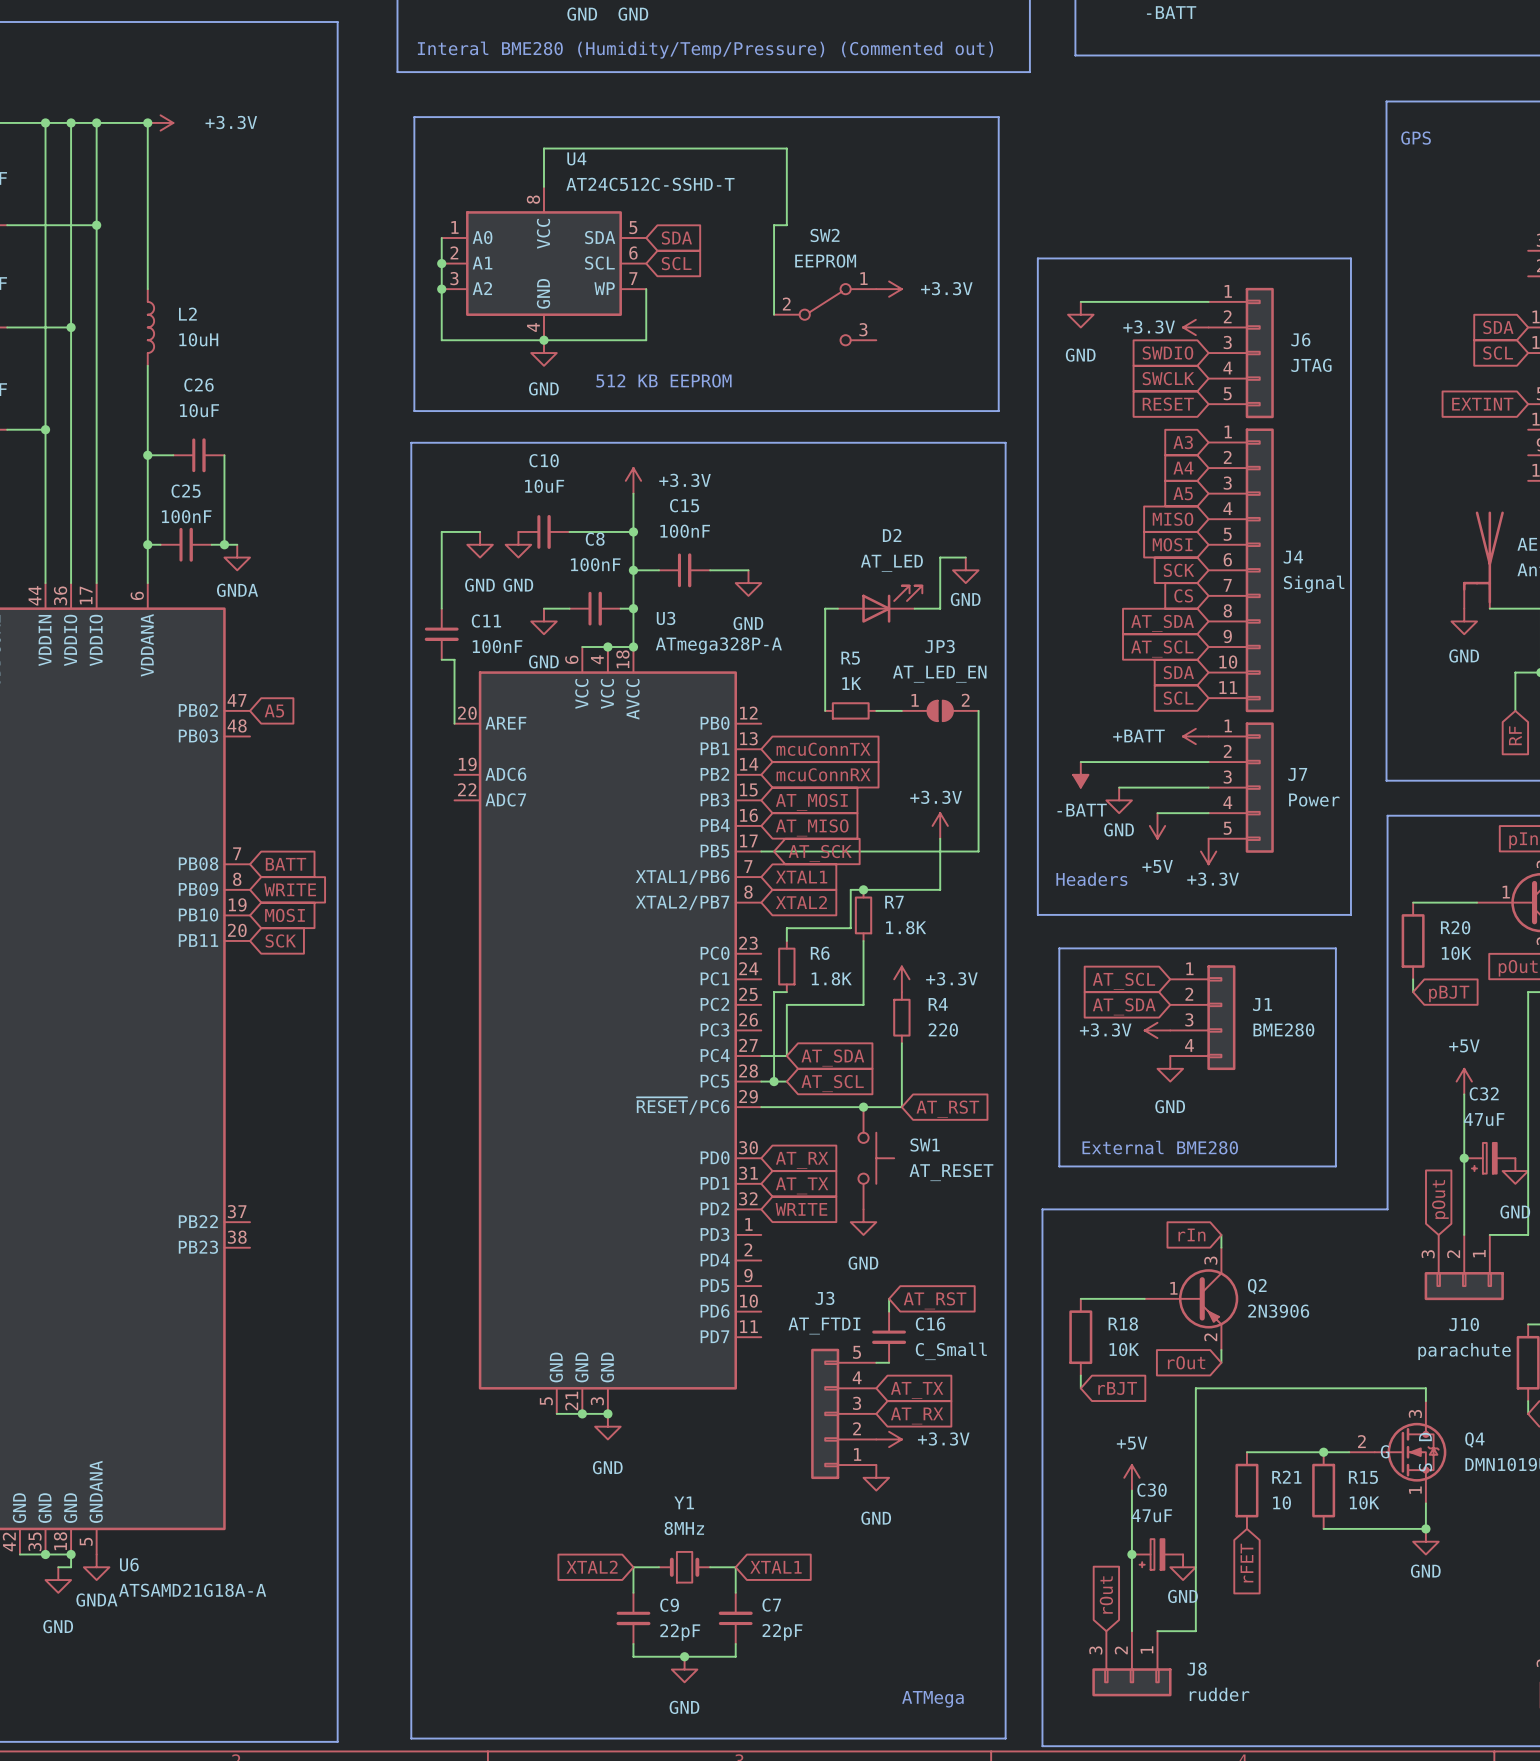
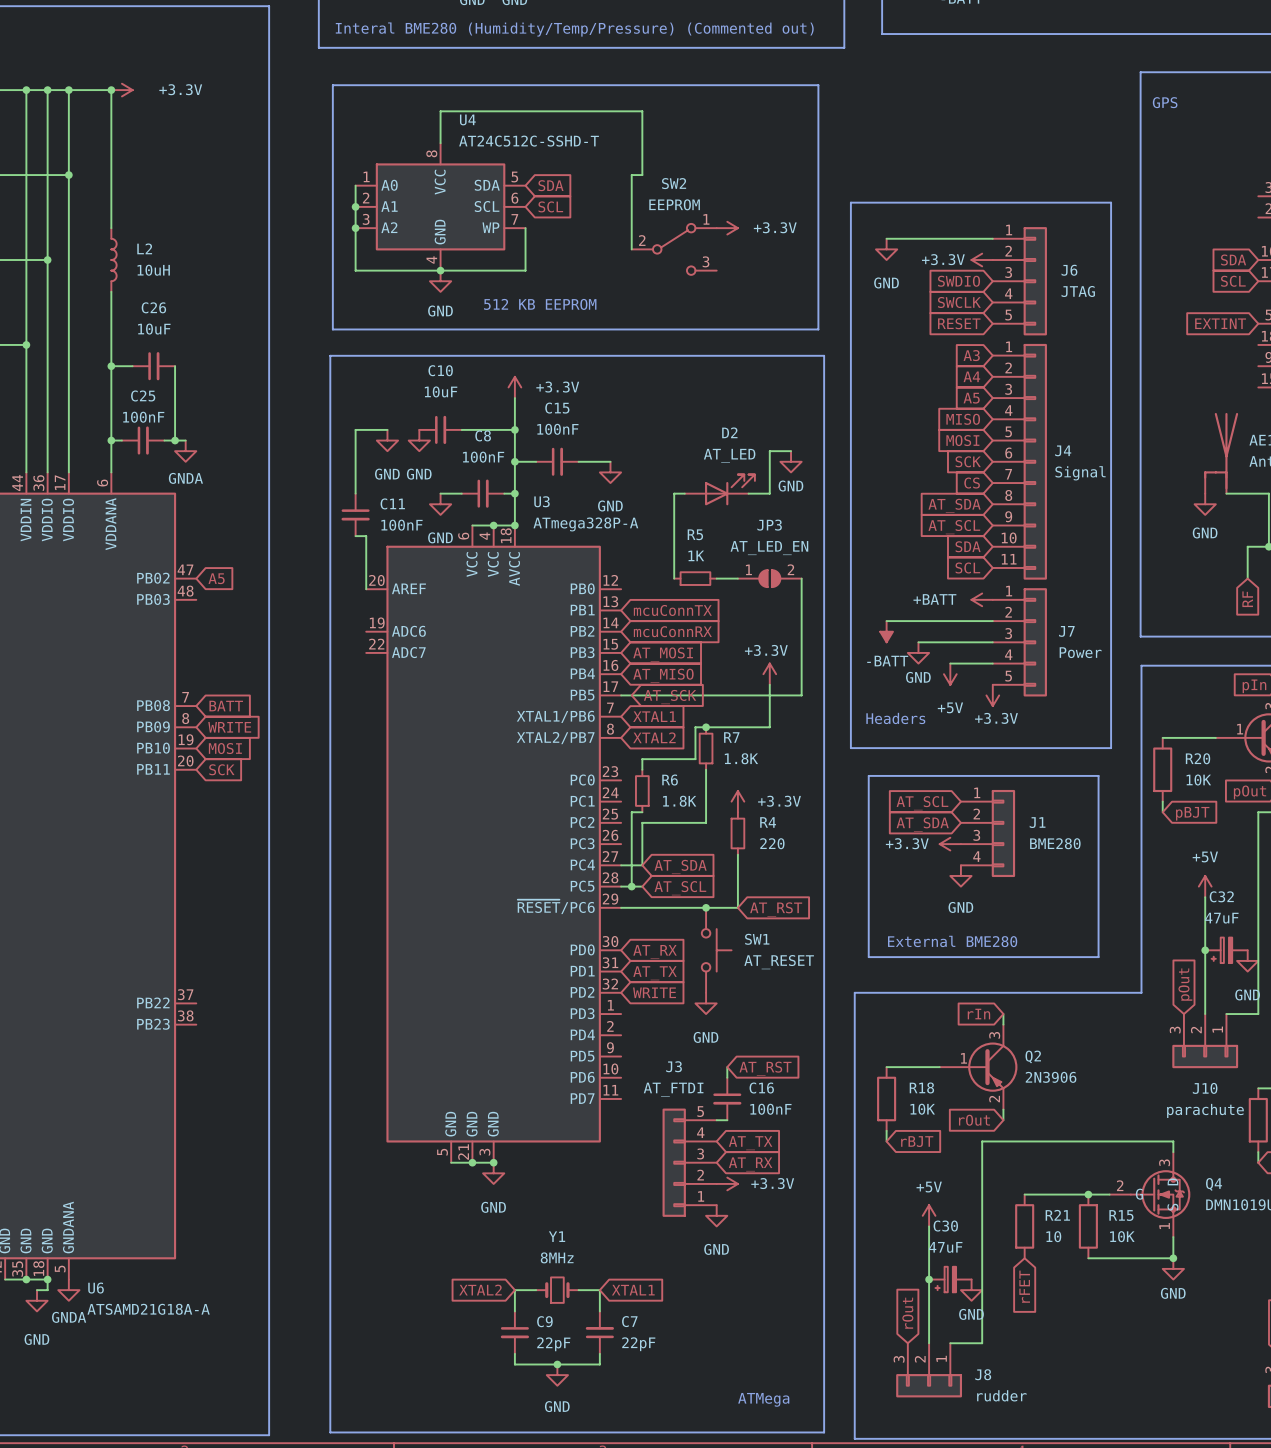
C16 value: C_Small (951, 1351) -> 100nF (770, 1109)

